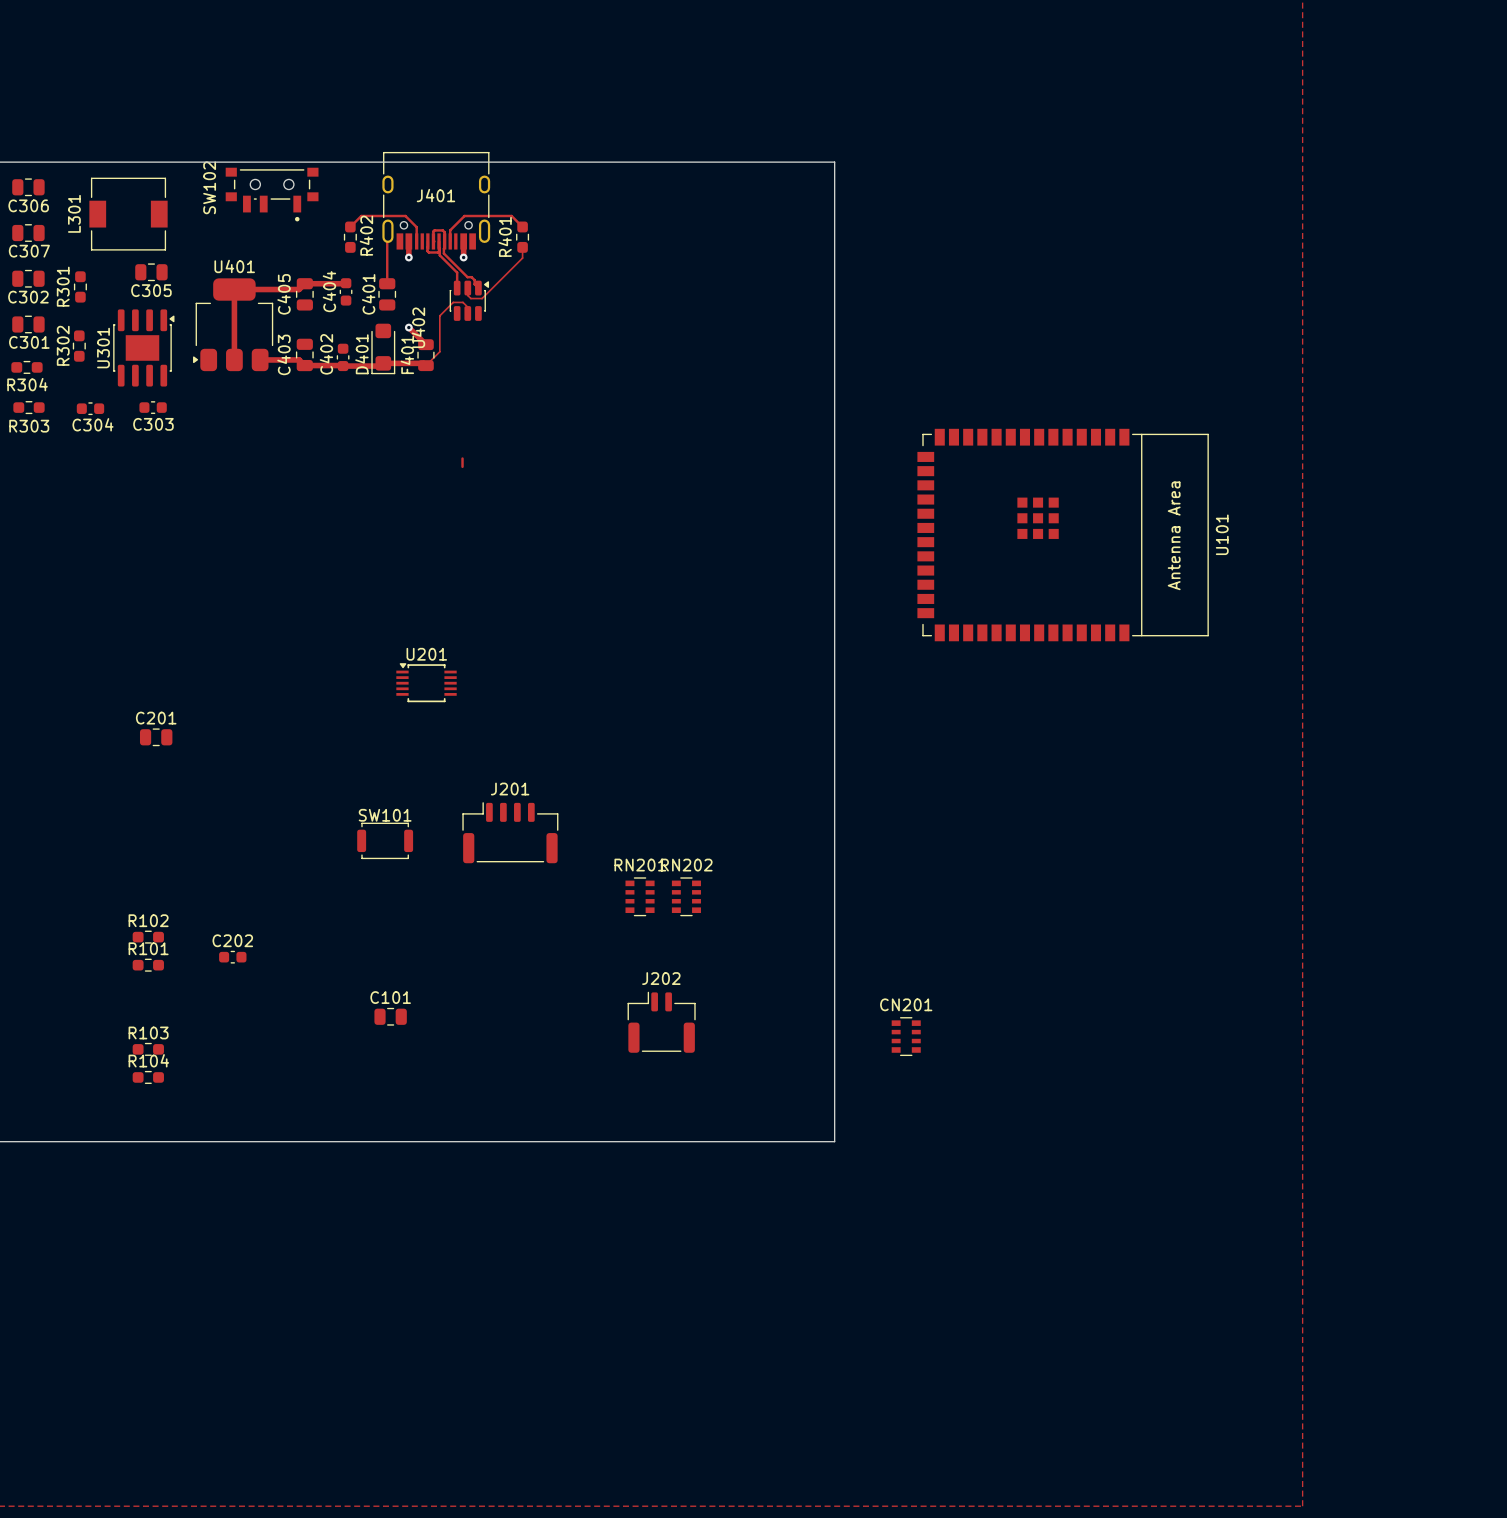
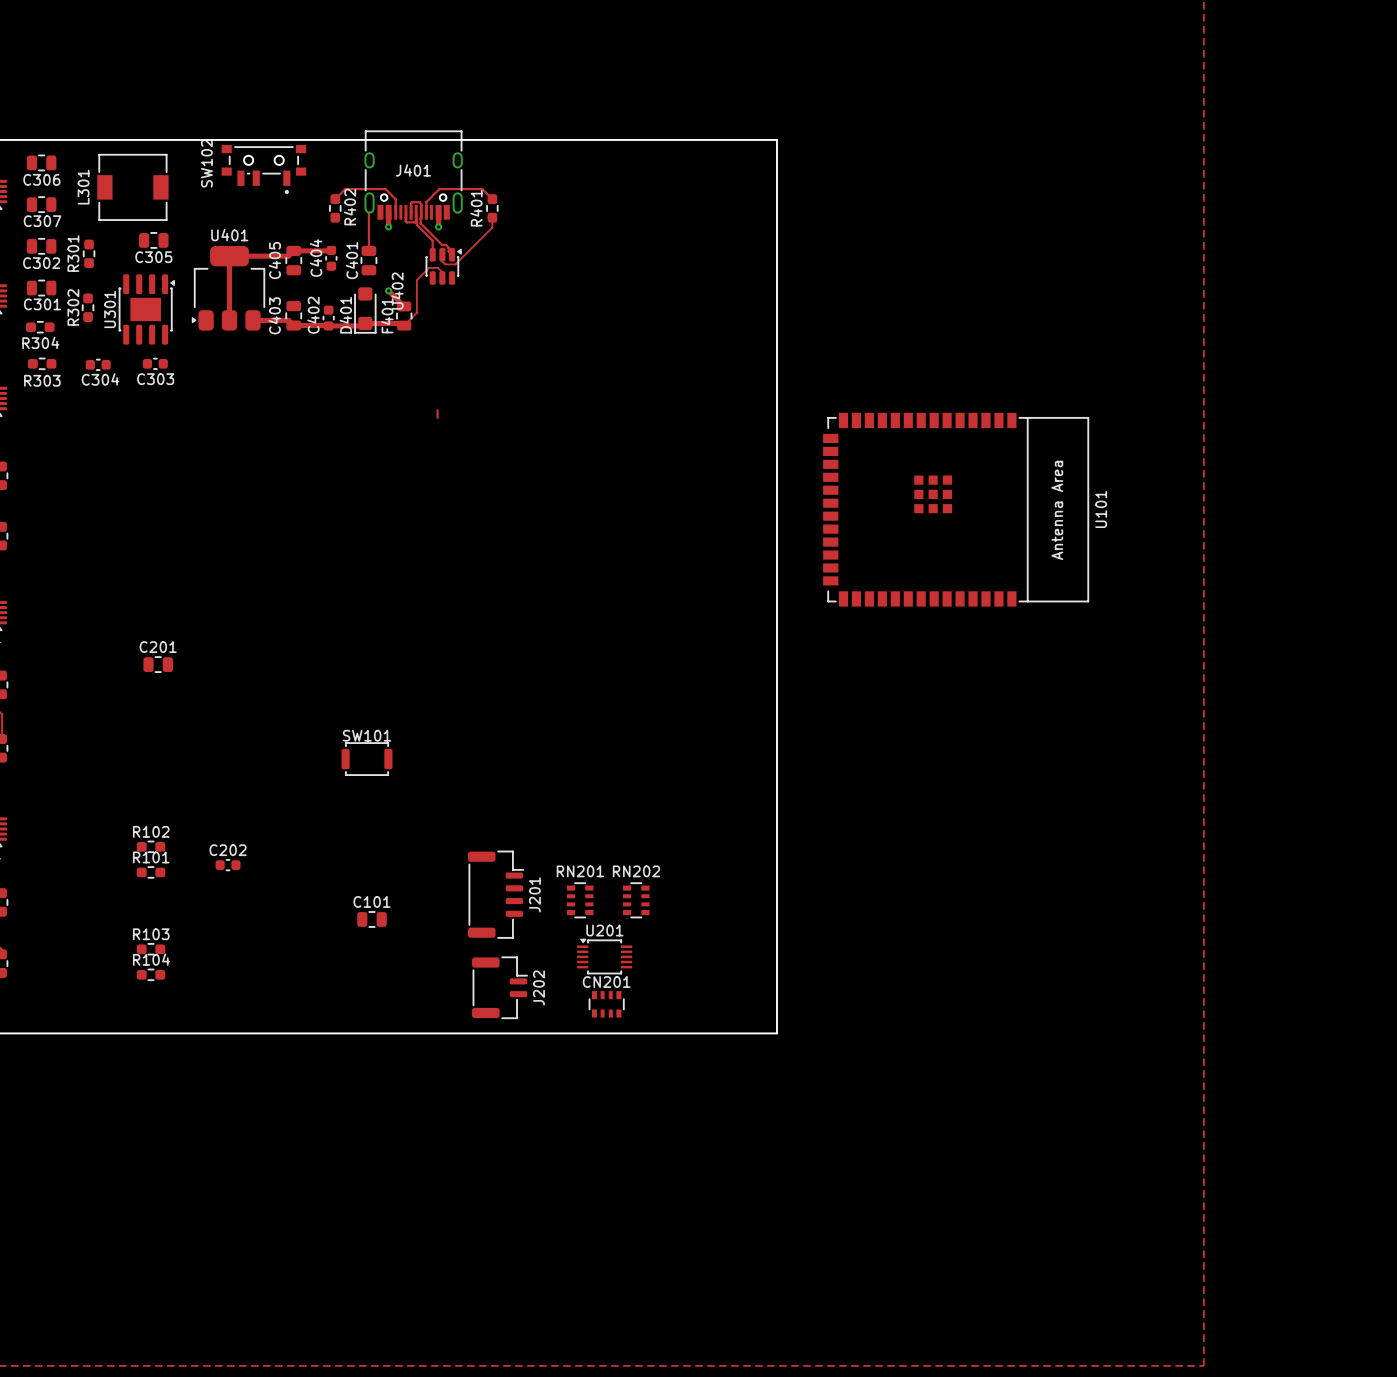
U101 position: (1063, 535) -> (956, 509)
U201 position: (426, 682) -> (604, 956)
J201 rotation: 0° (510, 832) -> 90° clockwise (495, 894)
J201 position: (510, 832) -> (495, 894)
RN201 position: (640, 896) -> (580, 900)
RN202 position: (686, 896) -> (636, 900)
J202 rotation: 0° (661, 1022) -> 90° clockwise (499, 987)
J202 position: (661, 1022) -> (499, 987)
CN201 rotation: 0° (906, 1036) -> 90° clockwise (606, 1004)
CN201 position: (906, 1036) -> (606, 1004)

